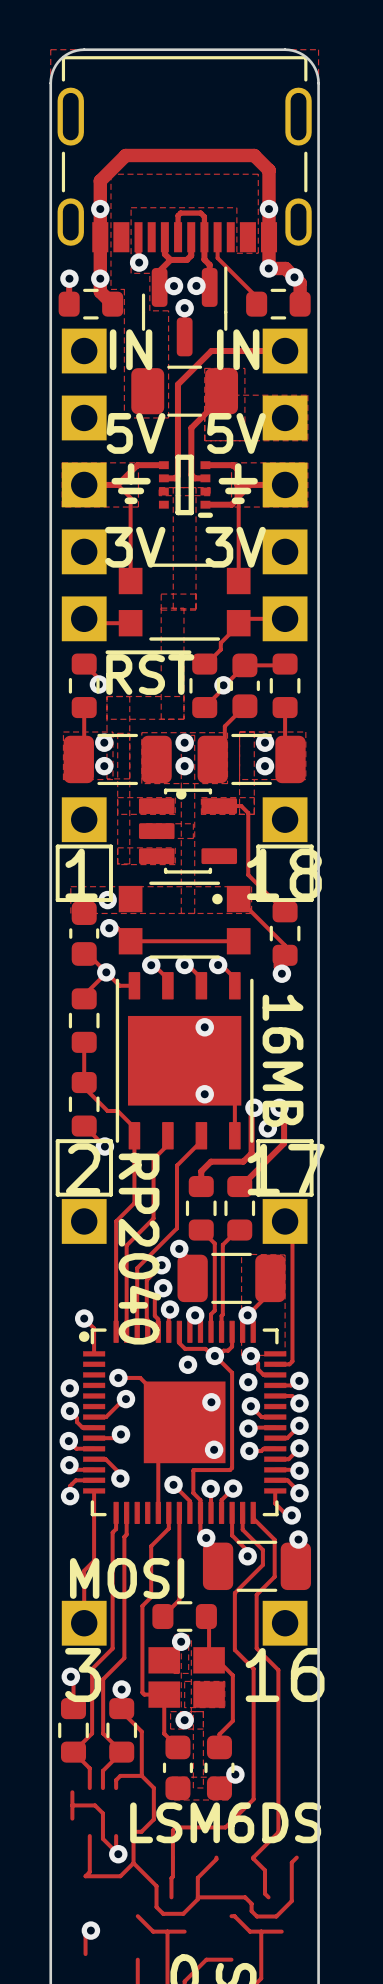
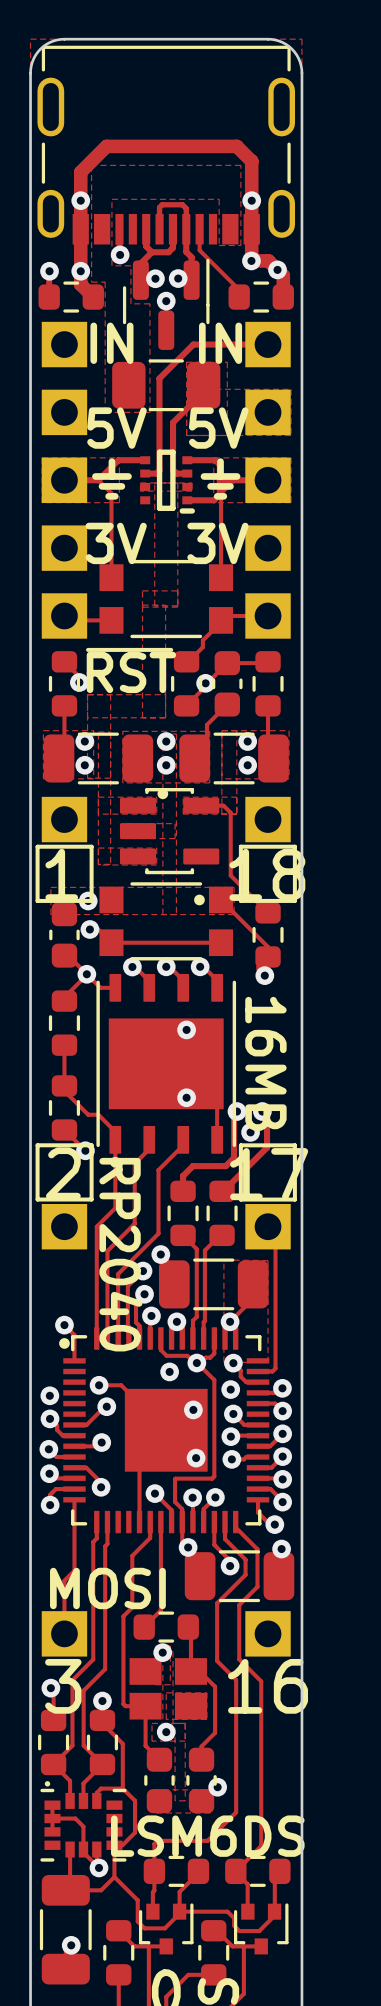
part: none -> (83, 1821)
part: none -> (176, 1871)
part: none -> (257, 1871)
part: none -> (166, 1928)
part: none -> (261, 1928)
part: none -> (65, 1929)
part: none -> (118, 1952)
part: none -> (213, 1952)

